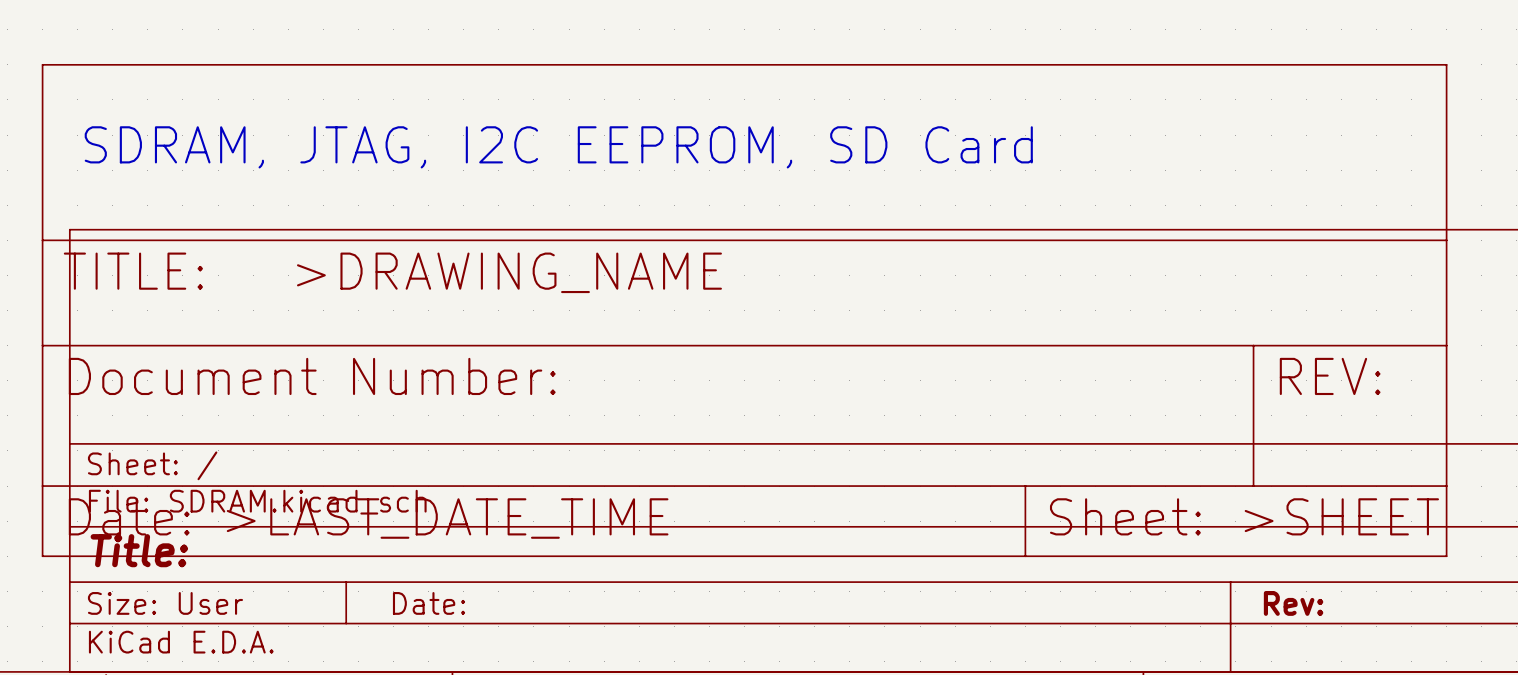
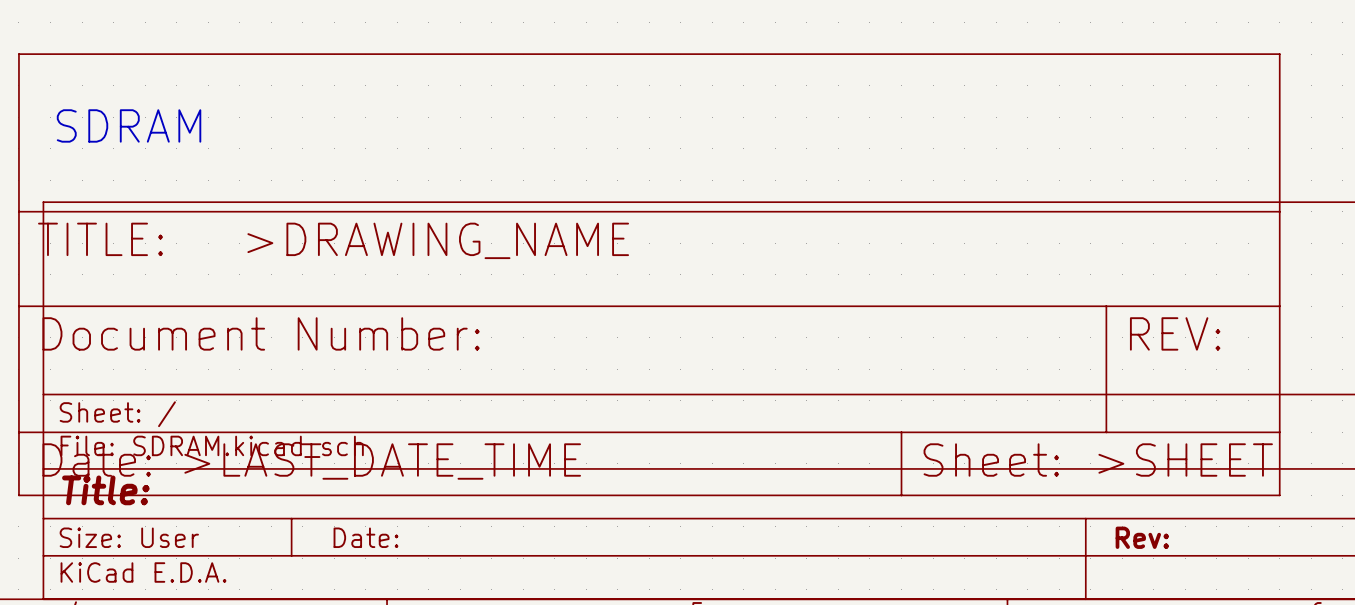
text: SDRAM, JTAG, I2C EEPROM, SD Card (558, 147) -> SDRAM (129, 125)

